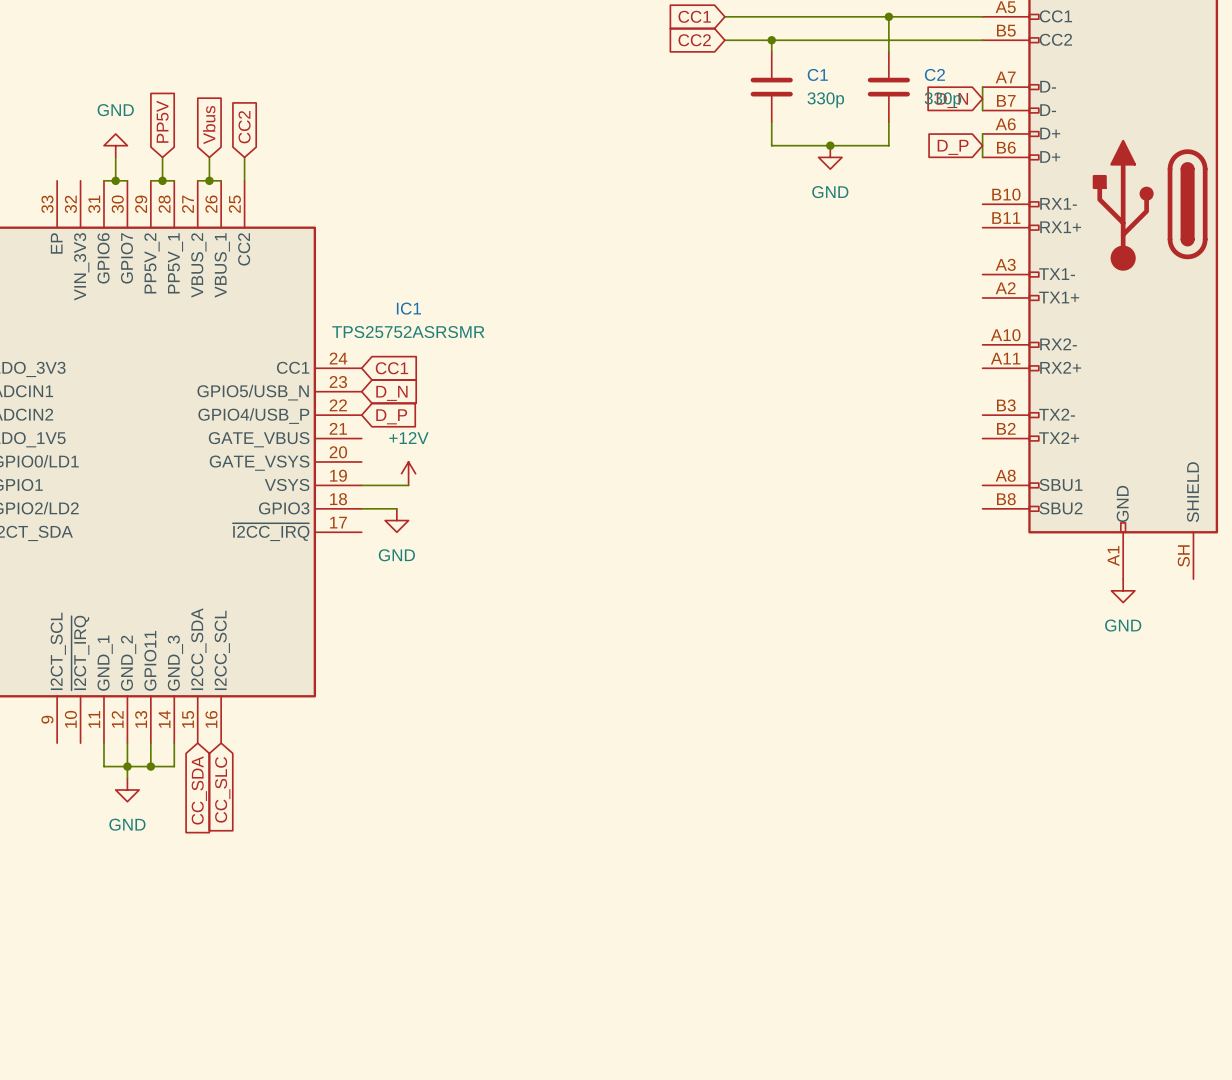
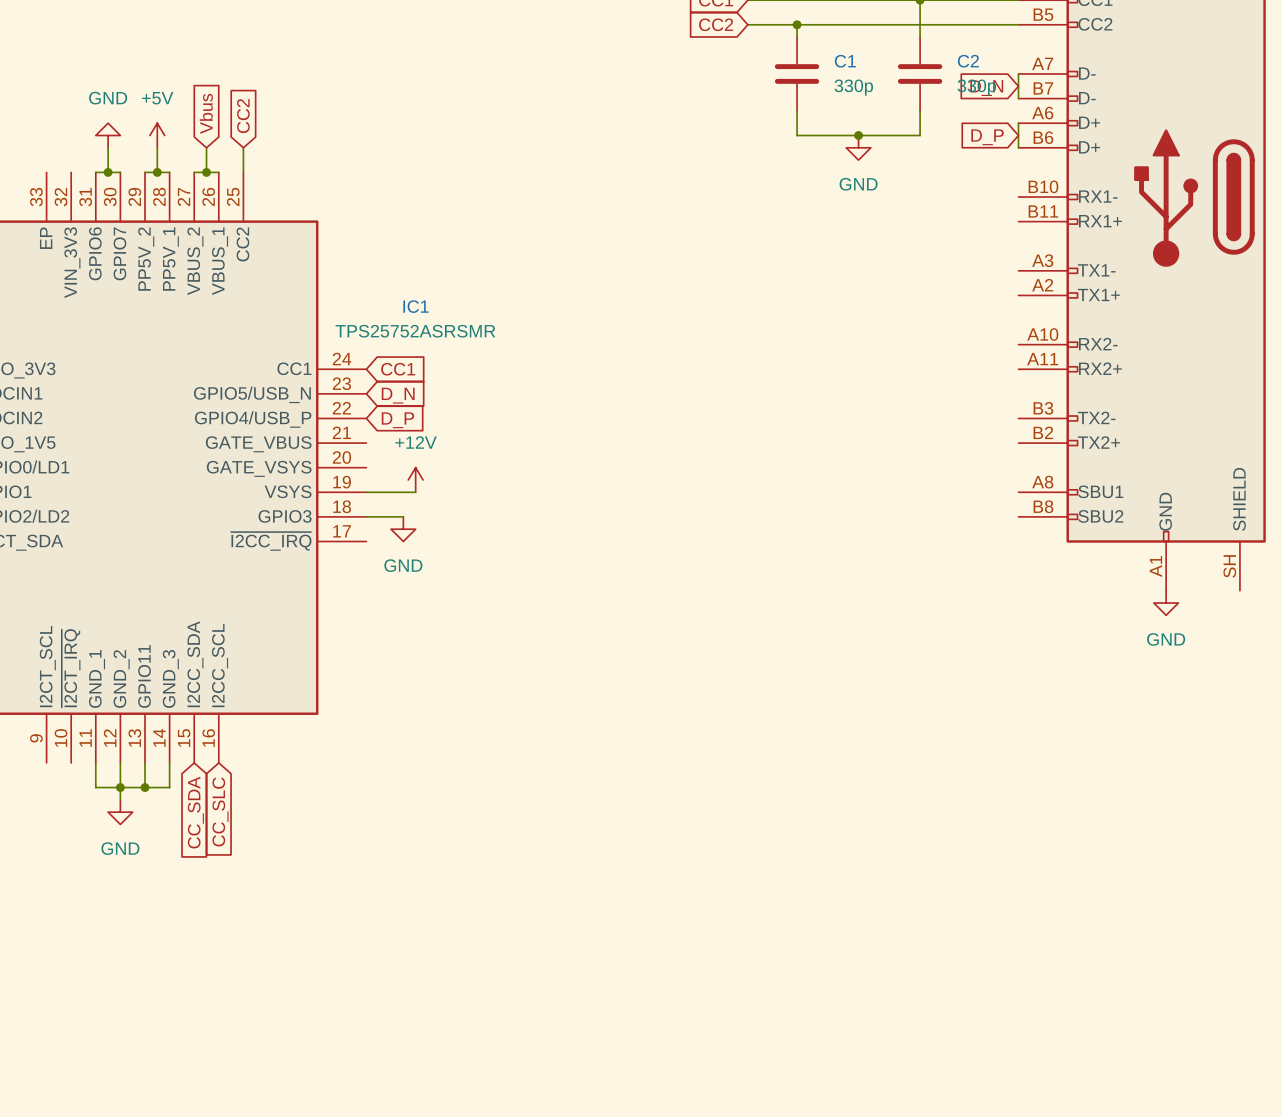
global label: PP5V (162, 121) -> none
power symbol: none -> +5V (157, 135)

